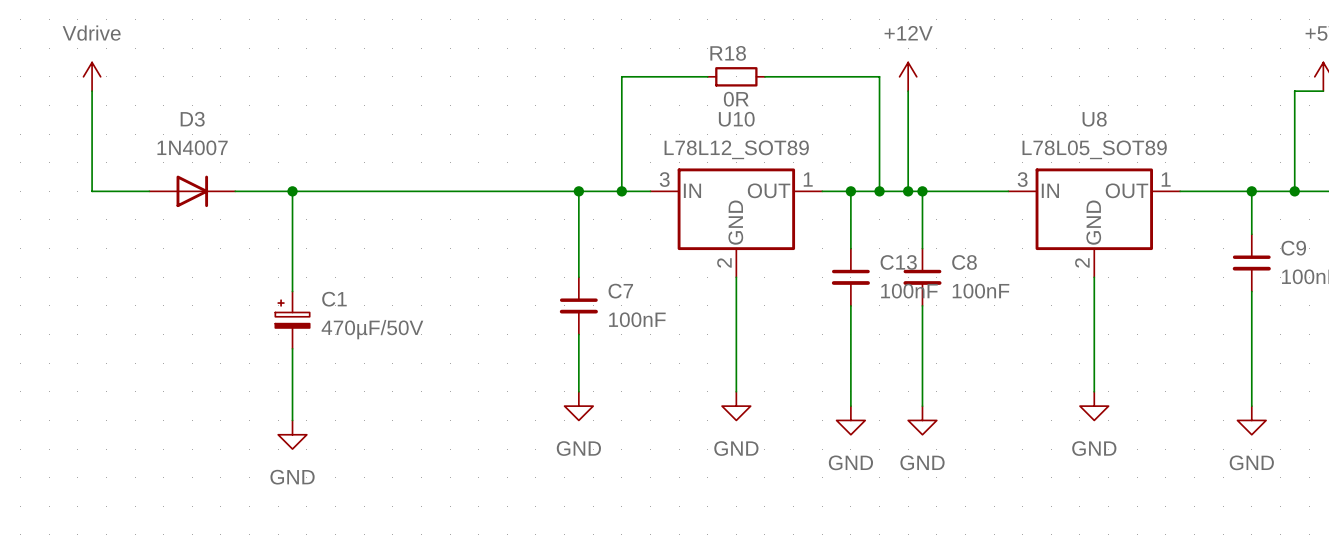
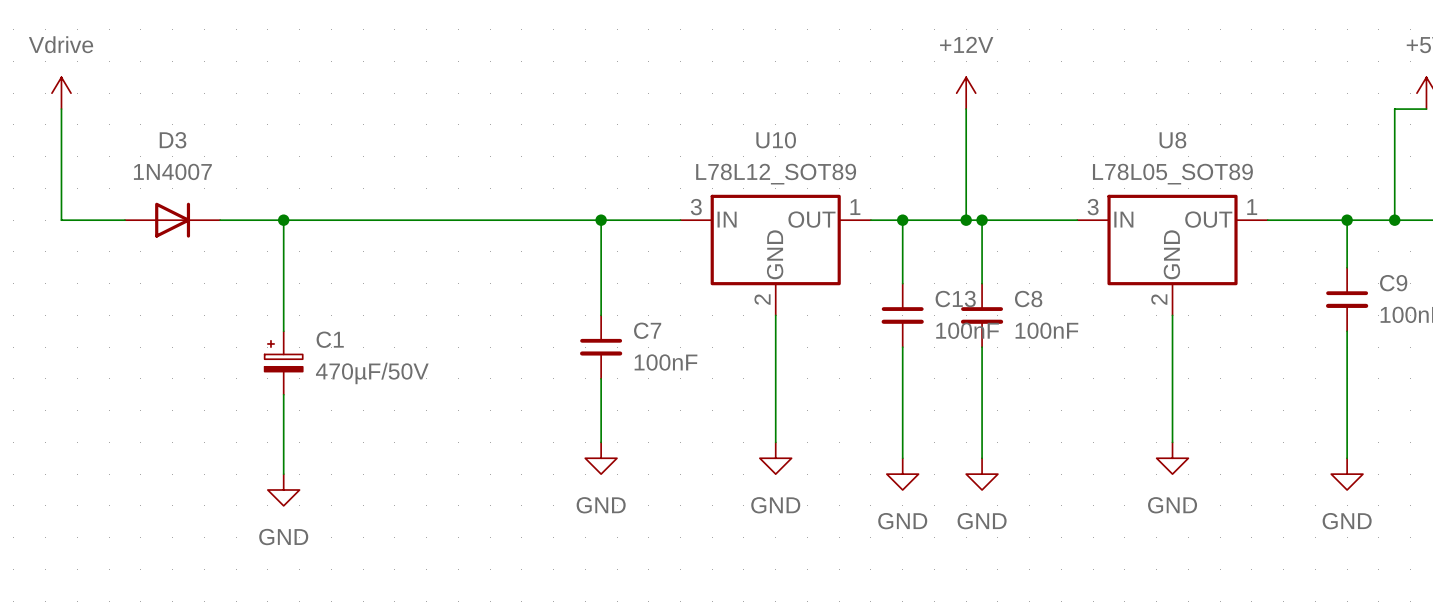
wire: (707, 76) (621, 76) (621, 191) -> none
R18: 0R (736, 76) -> none
wire: (764, 76) (879, 76) (879, 191) -> none
junction: (621, 191) -> none
junction: (879, 191) -> none

